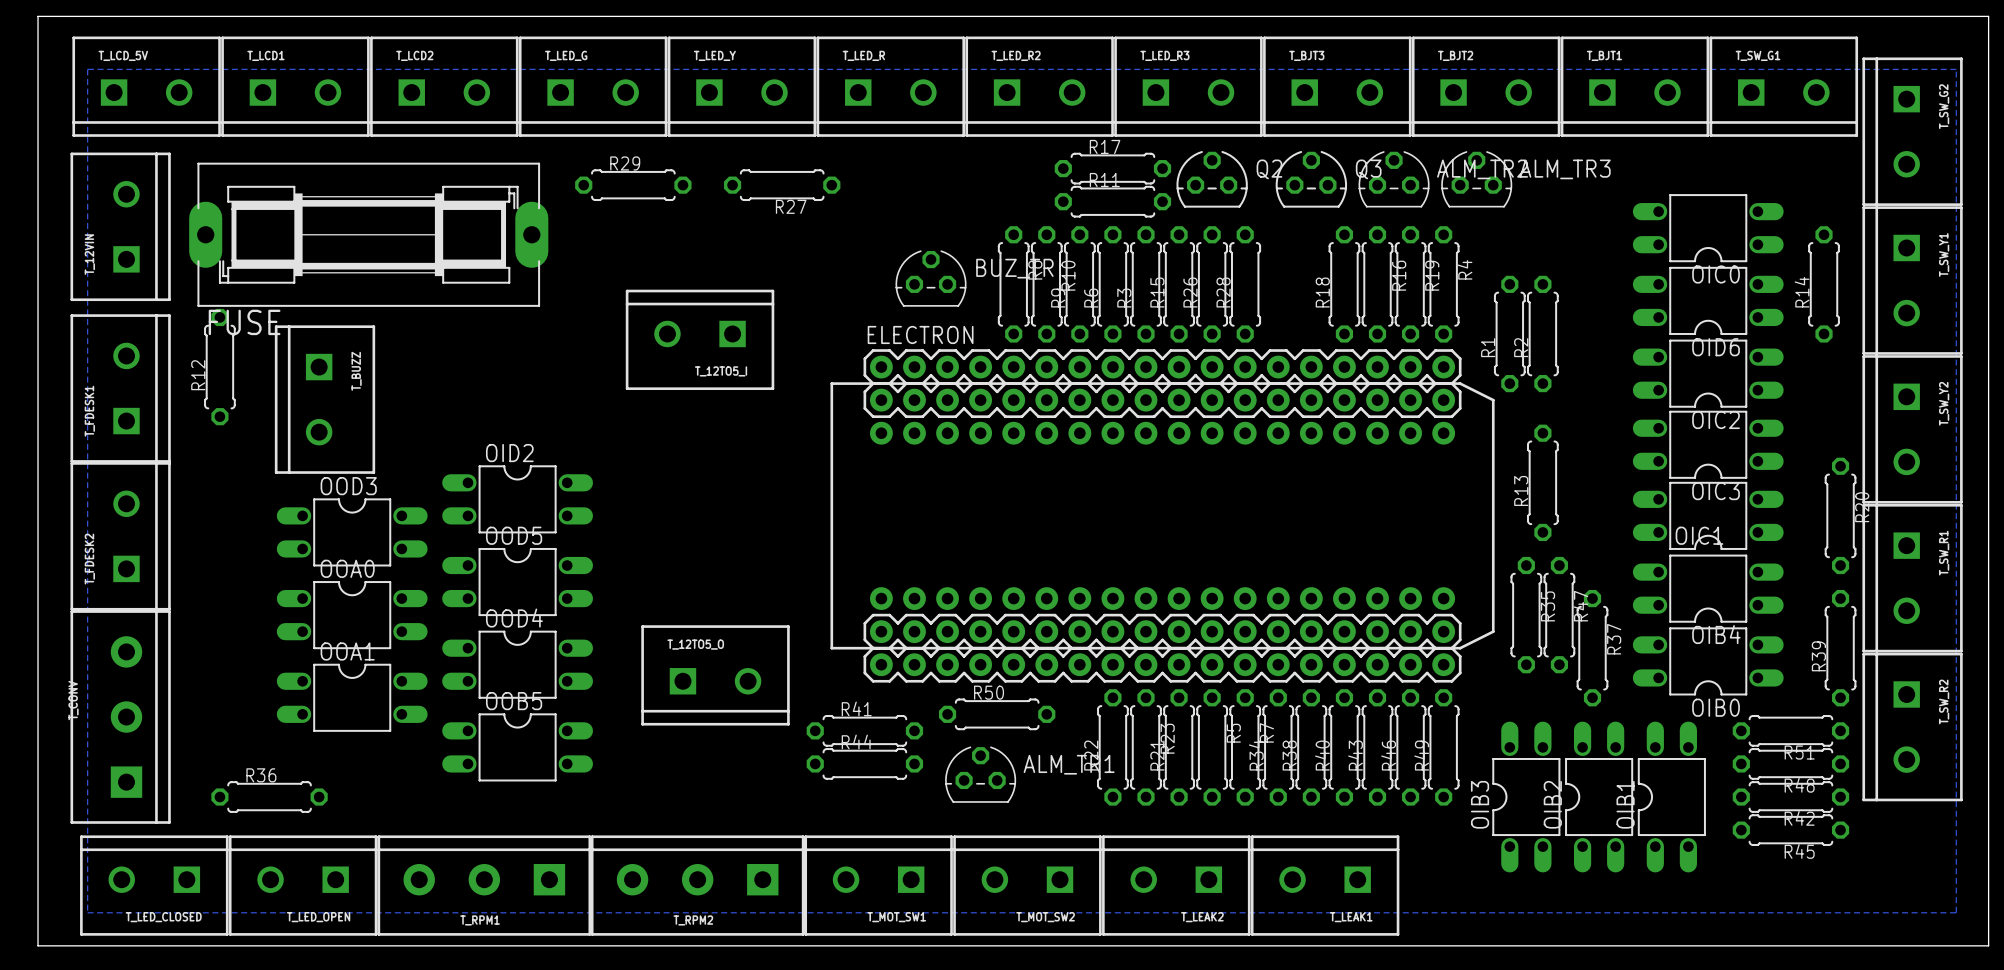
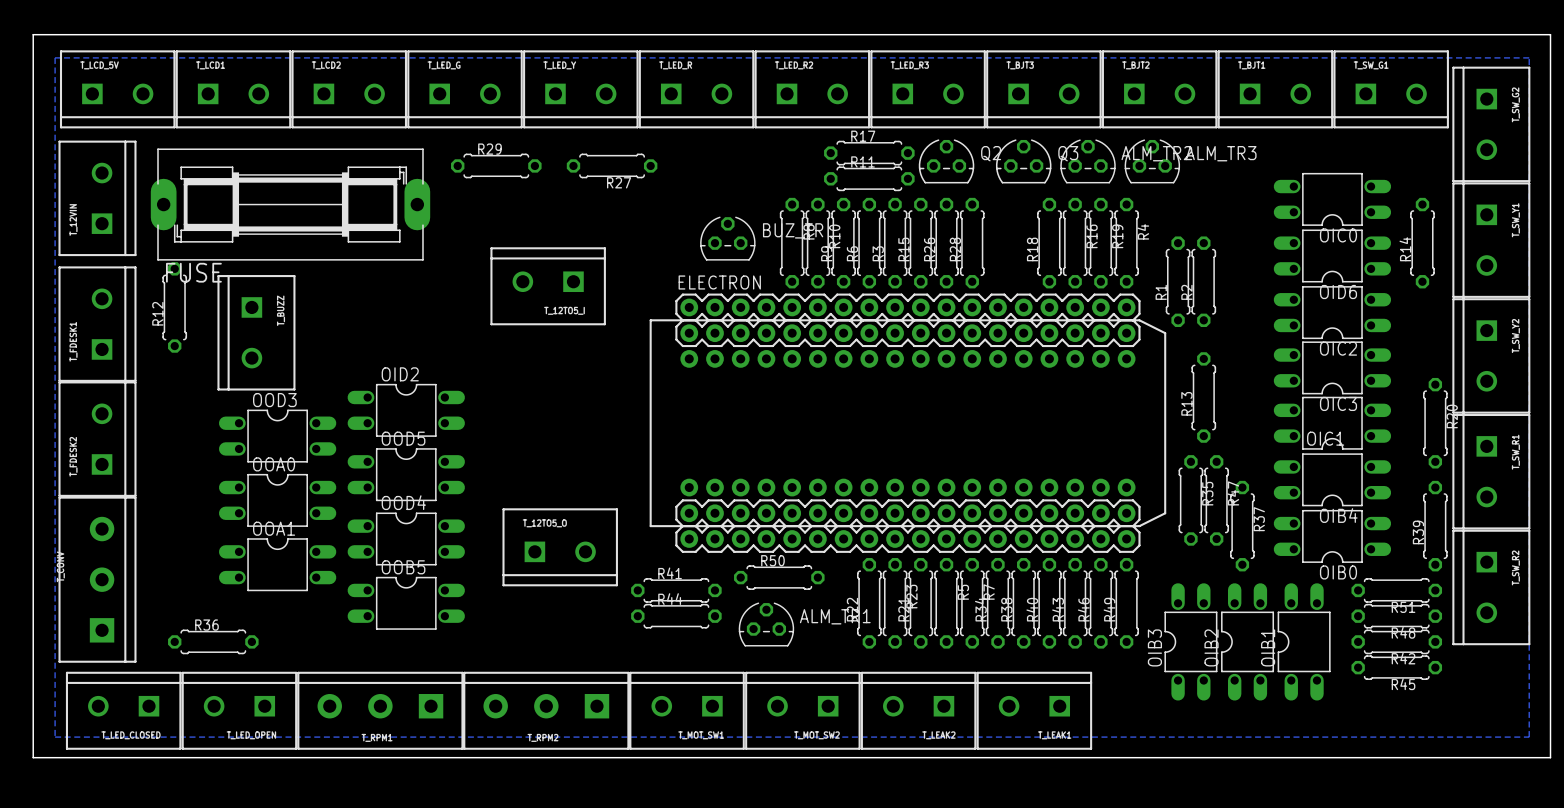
bottom zone outline: (87, 69) (87, 912) (1956, 912) (1956, 69) (87, 69) -> (55, 57) (55, 737) (1529, 737) (1529, 57) (55, 57)

